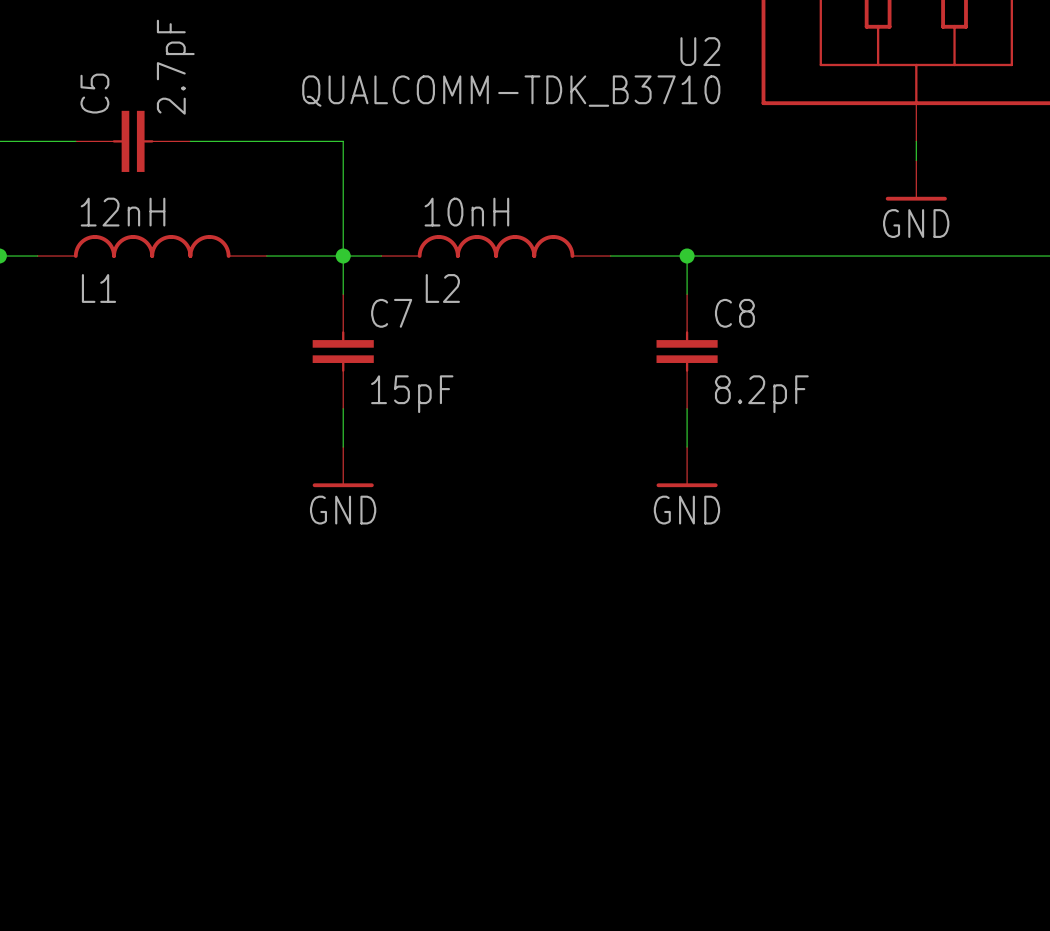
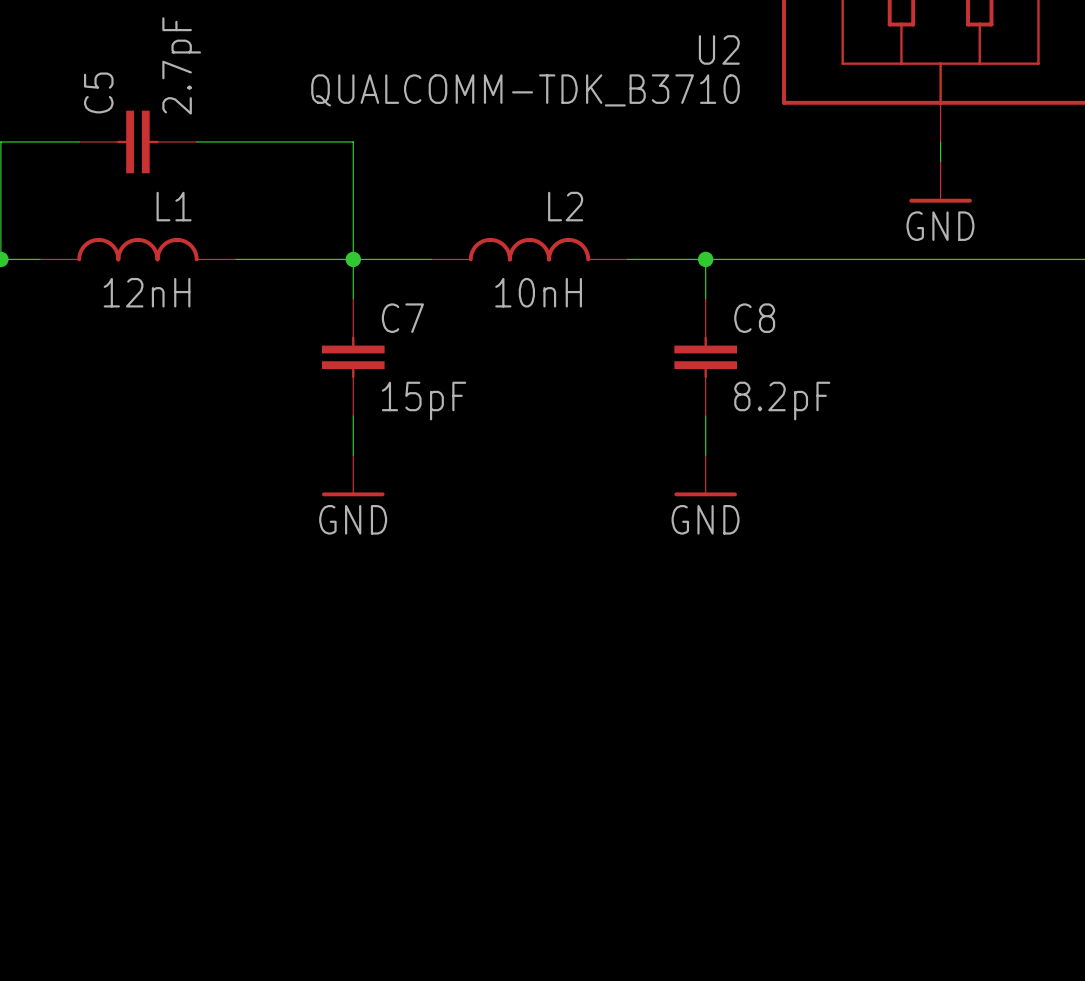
L1 value position: 12nH (123, 212) -> 12nH (147, 292)
L2 value position: 10nH (466, 212) -> 10nH (538, 292)
L1 symbol: [37, 235, 267, 258] -> [40, 237, 236, 262]
L2 symbol: [381, 235, 611, 258] -> [431, 237, 628, 262]
L1 name position: L1 (98, 288) -> L1 (174, 206)
L2 name position: L2 (442, 288) -> L2 (565, 206)

